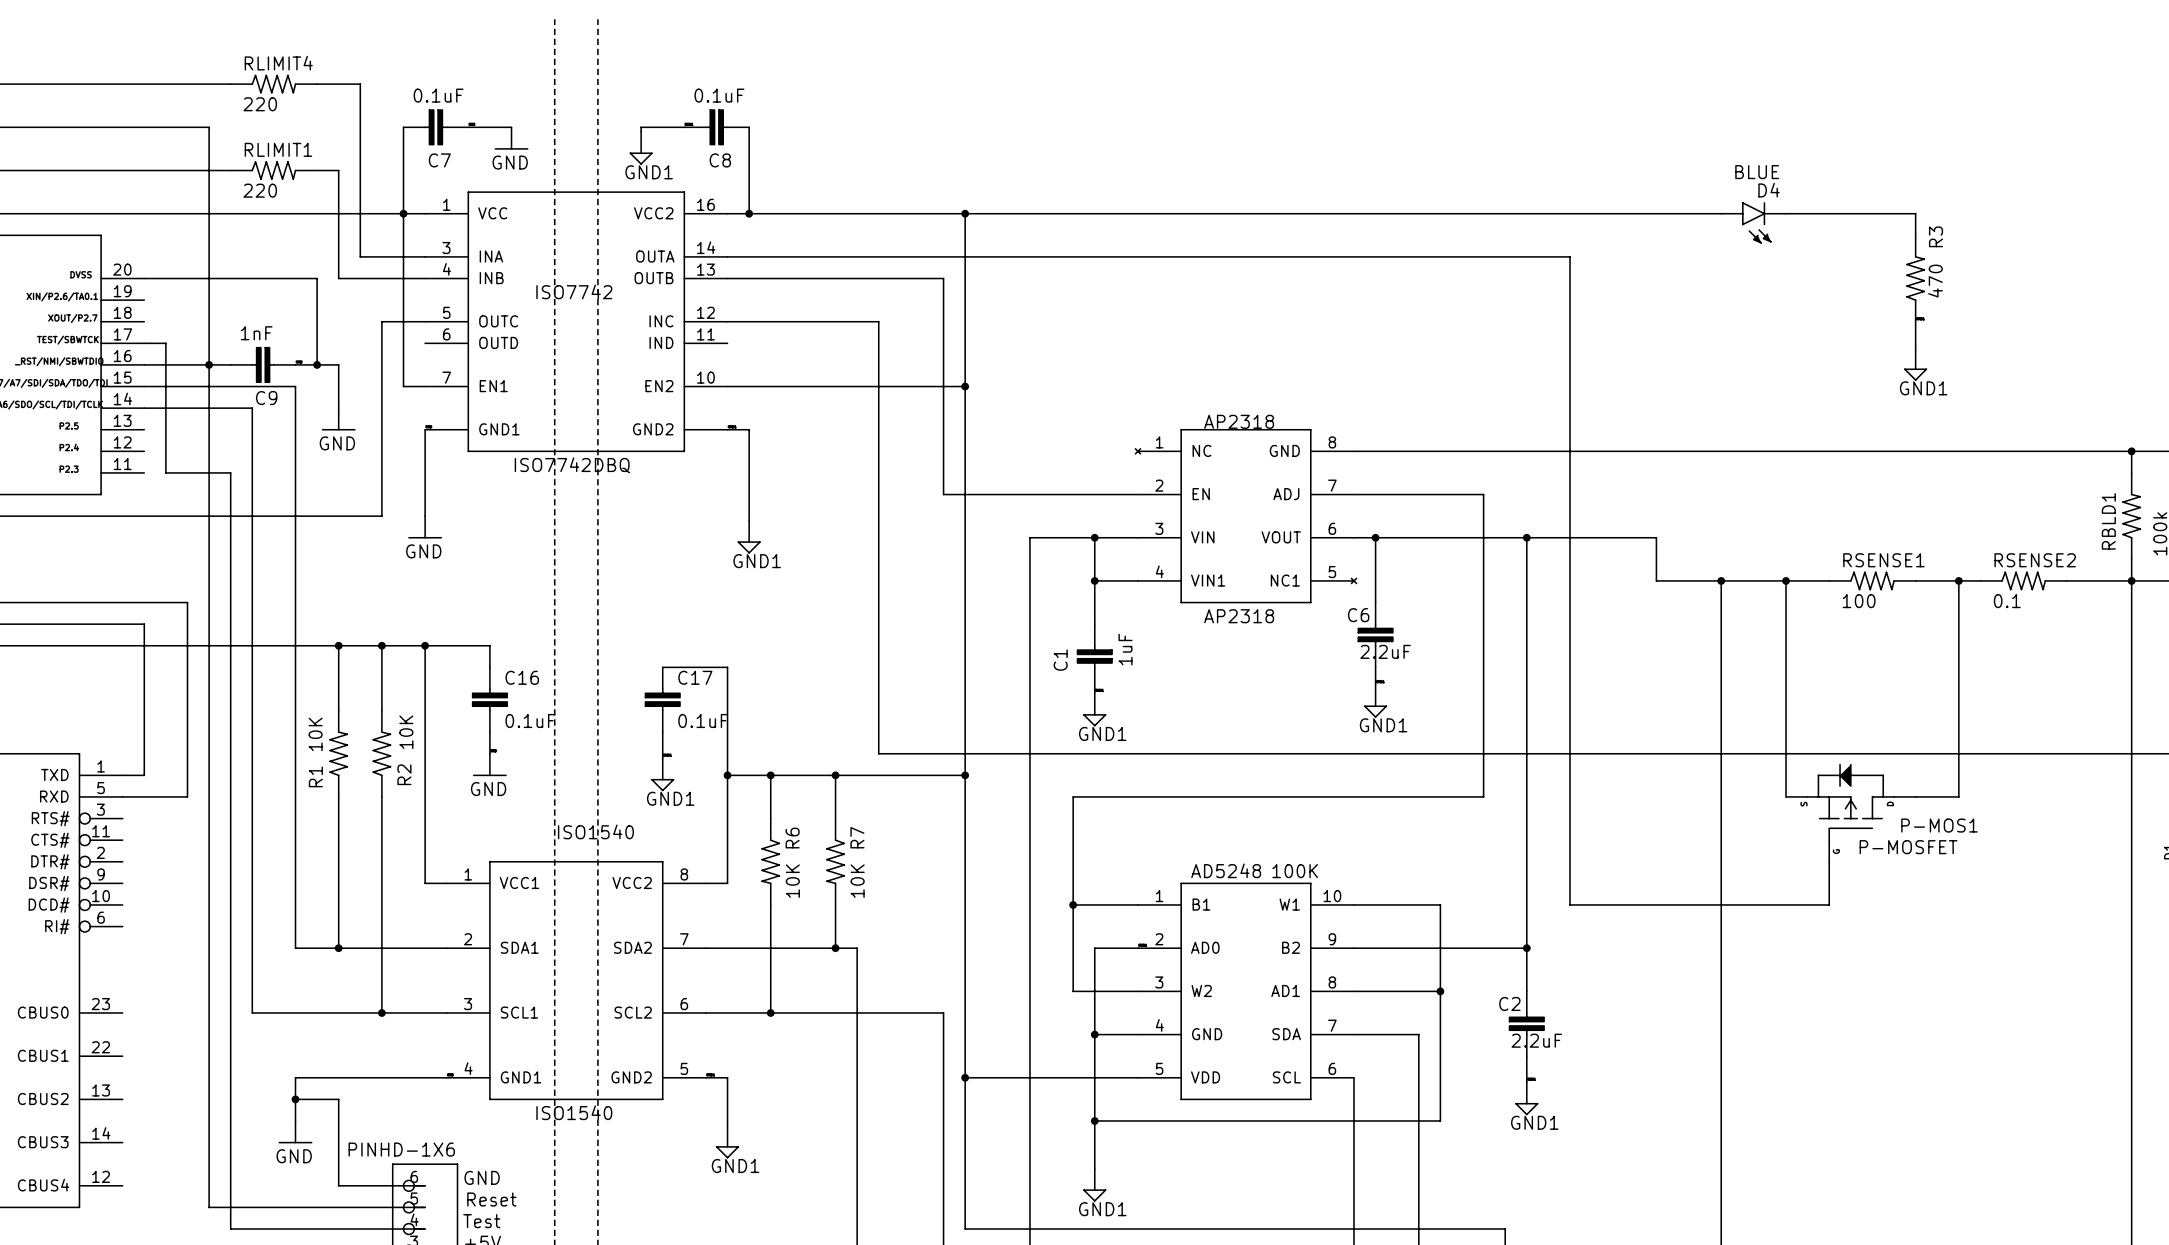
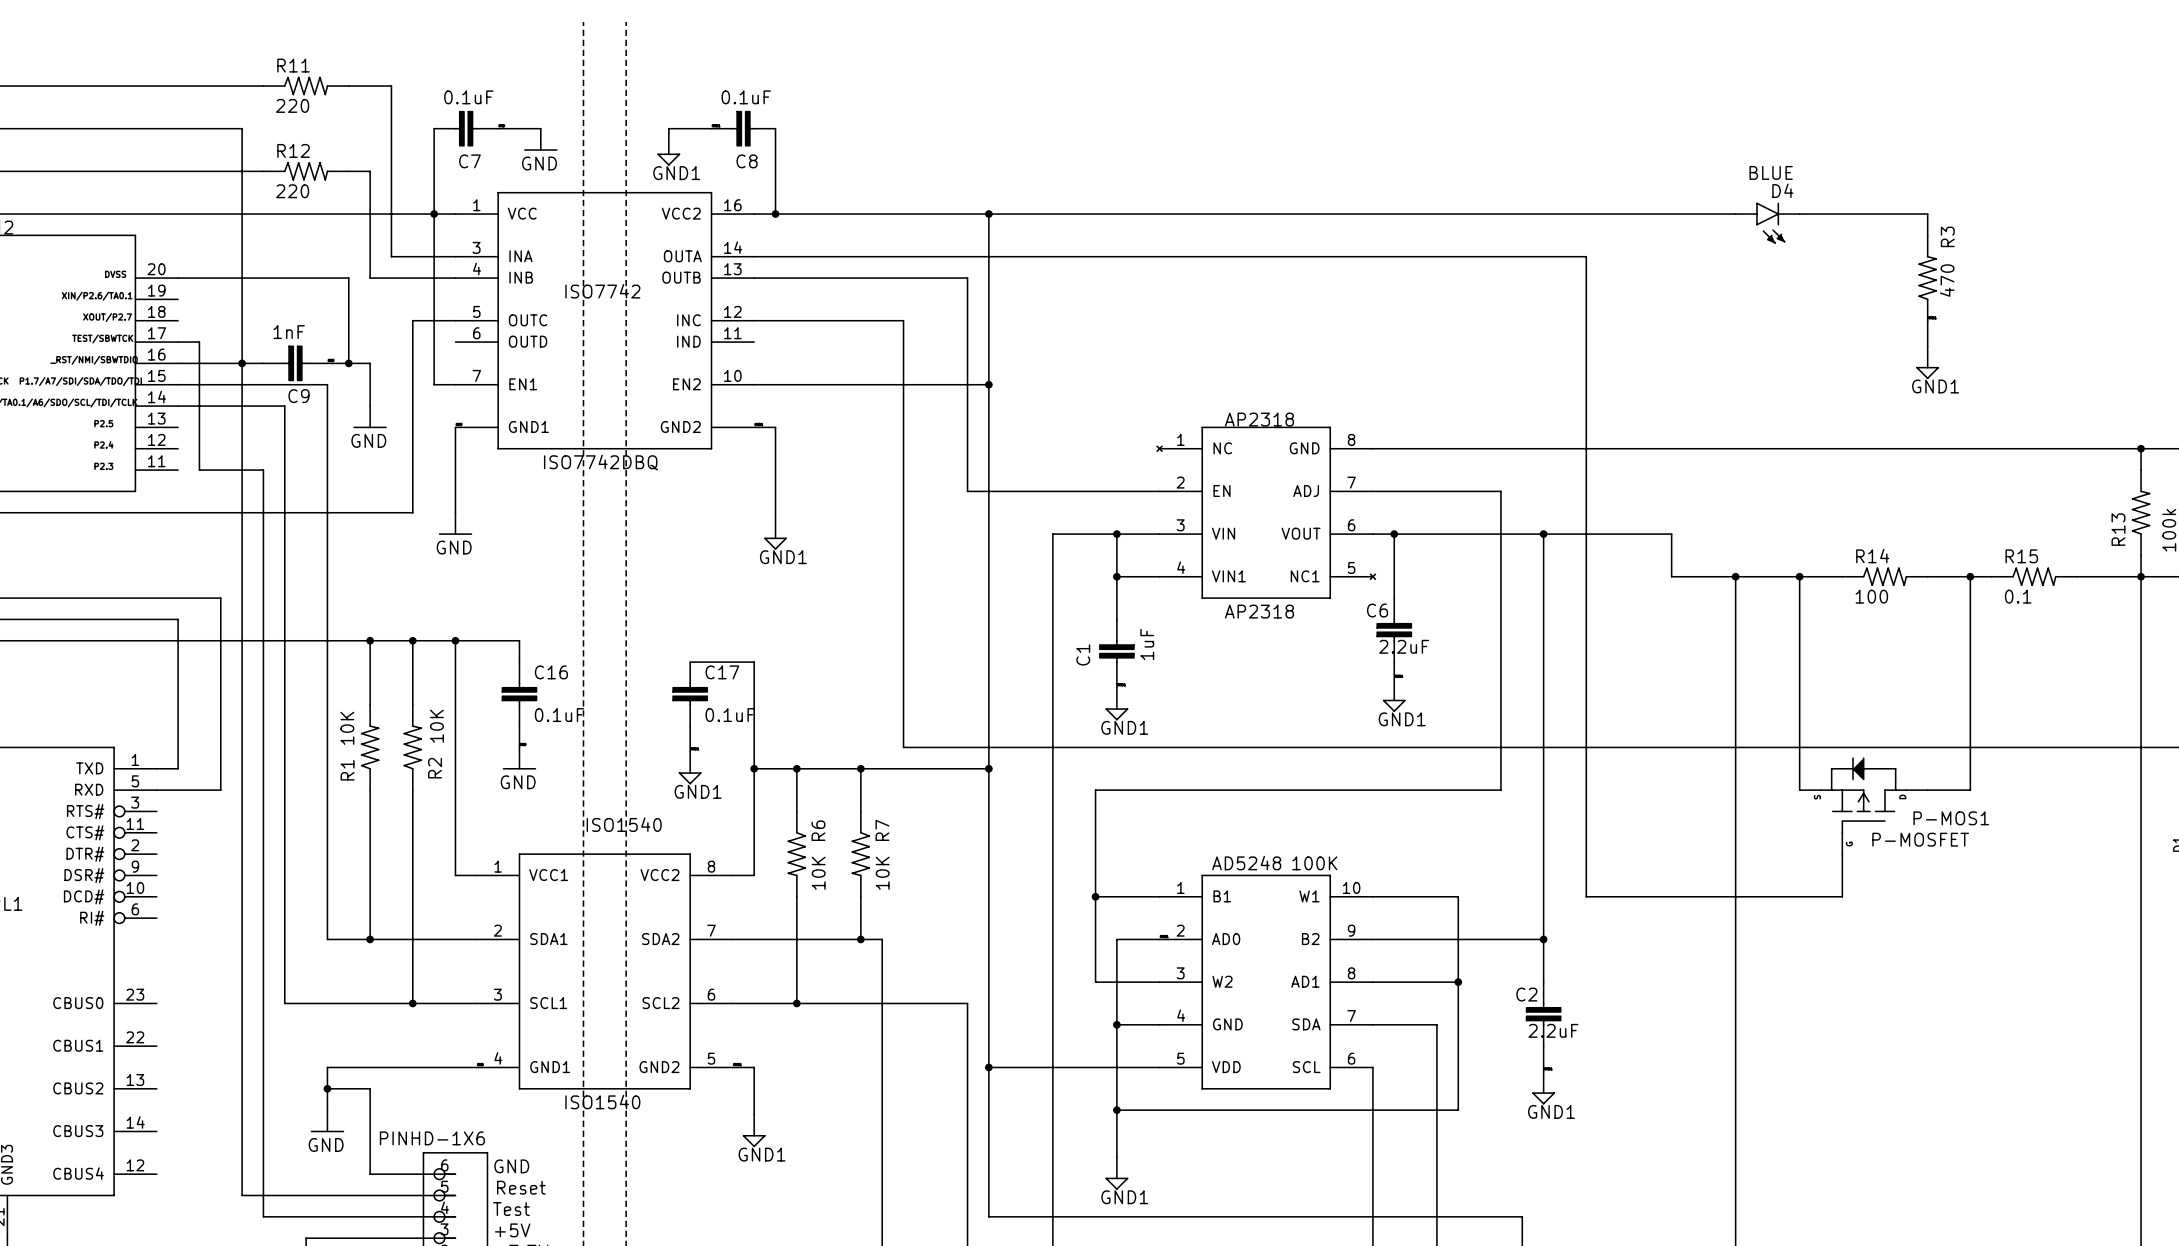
RLIMIT4 name: RLIMIT4 (278, 63) -> R11 (293, 65)
RLIMIT1 name: RLIMIT1 (278, 149) -> R12 (293, 150)
RBLD1 name: RBLD1 (2108, 521) -> R13 (2118, 529)
RSENSE1 name: RSENSE1 (1883, 560) -> R14 (1872, 556)
RSENSE2 name: RSENSE2 (2035, 560) -> R15 (2021, 556)

